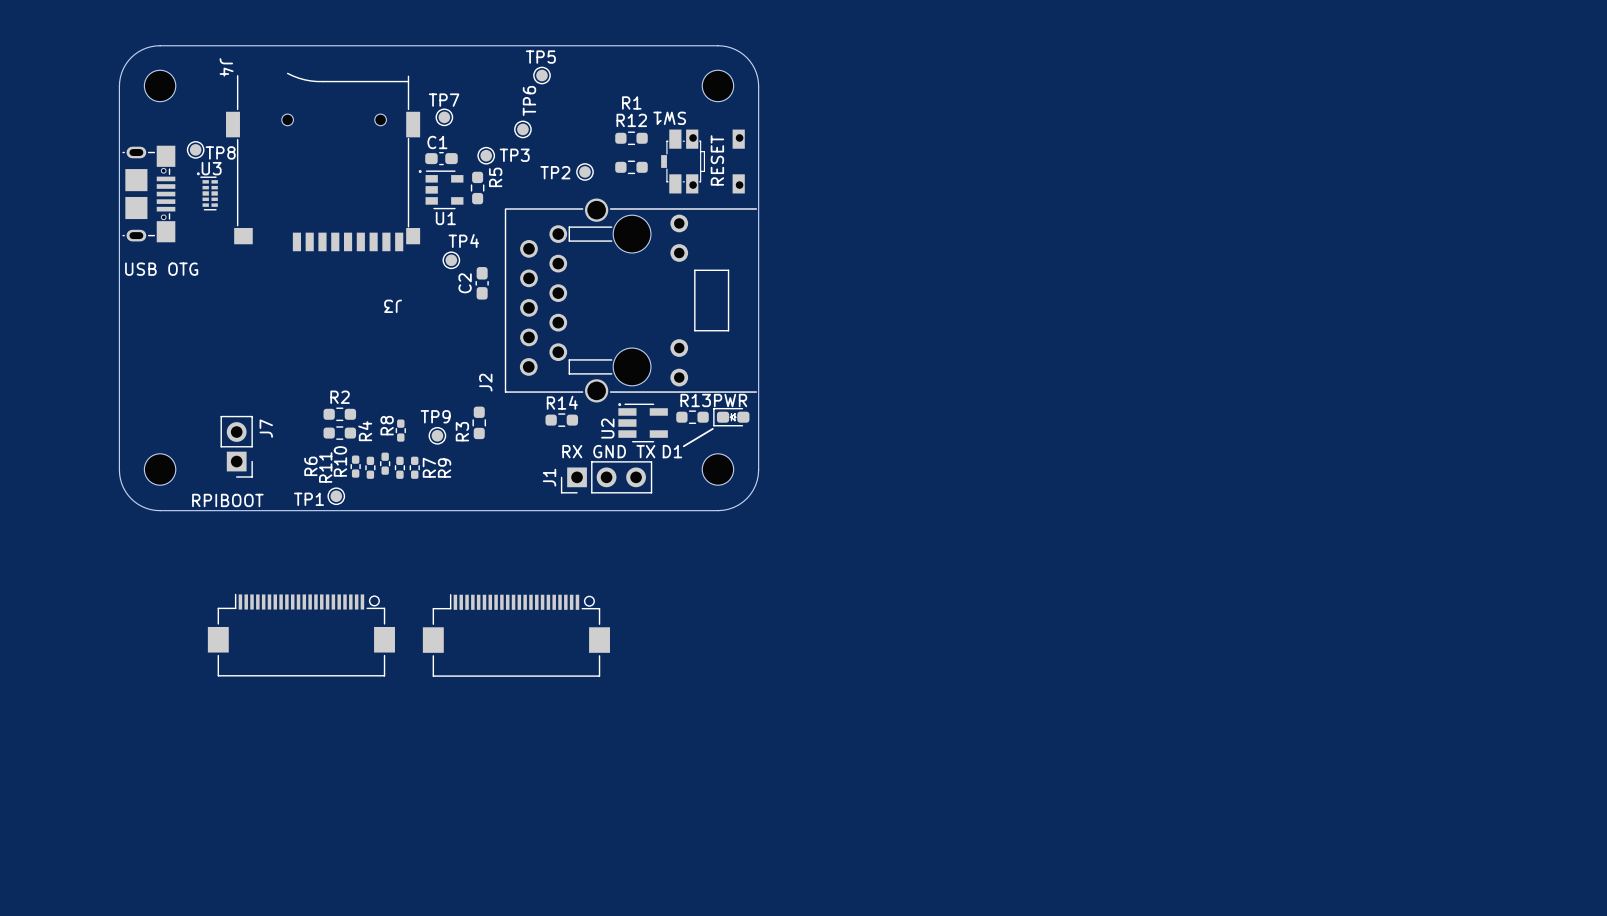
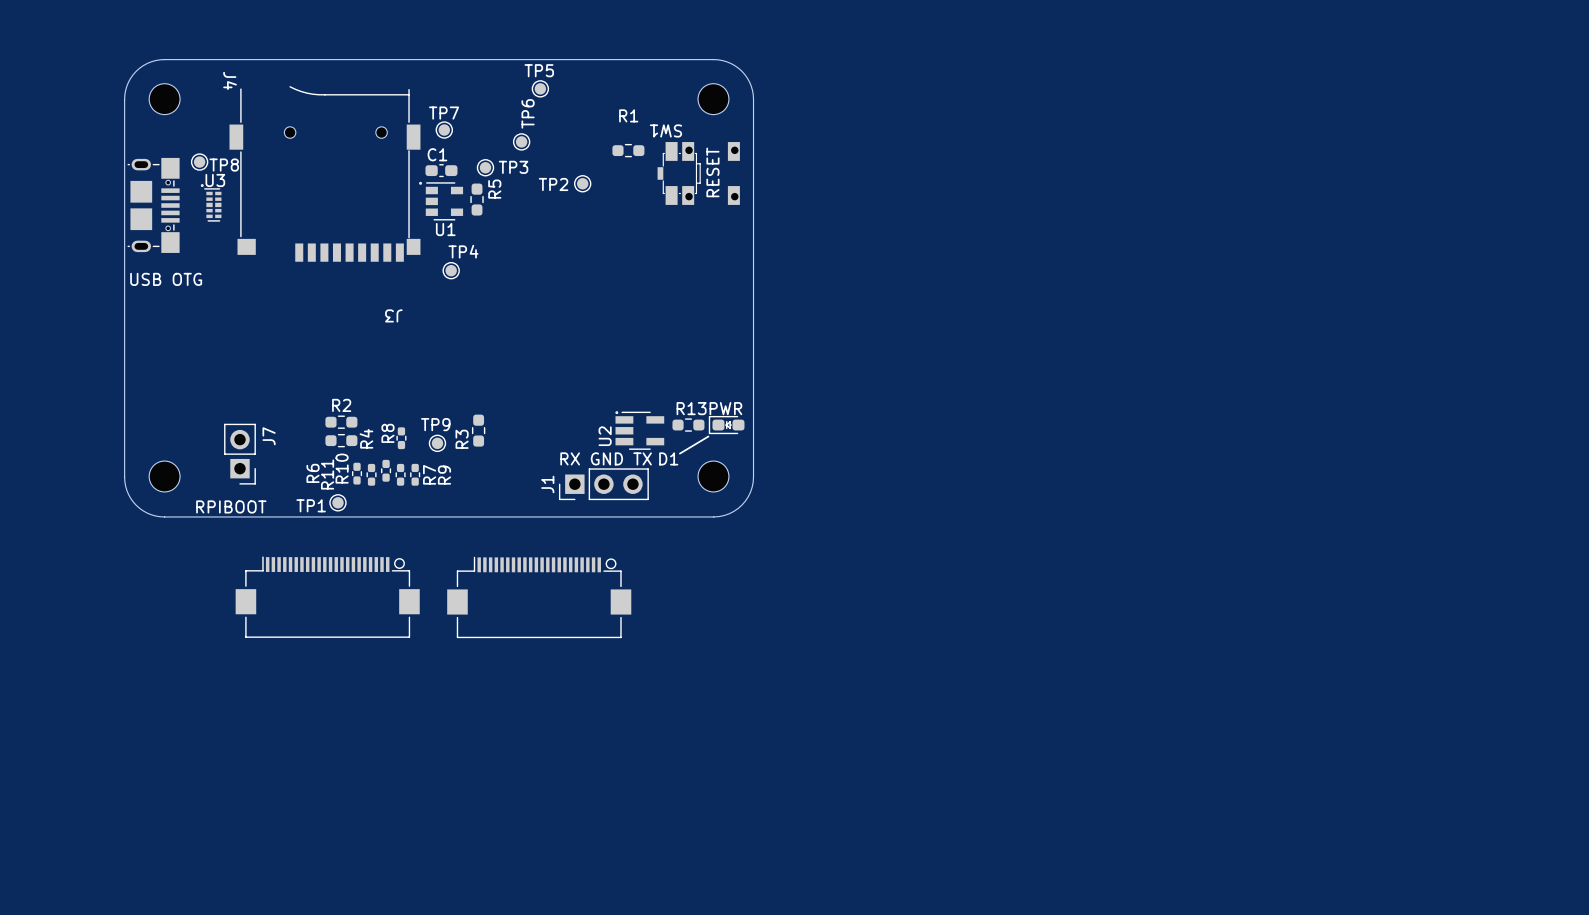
R12: (631, 167) -> none
C2: (482, 283) -> none
J2: (630, 300) -> none
R14: (561, 420) -> none
part position: (301, 635) -> (327, 597)
part position: (516, 635) -> (539, 597)

